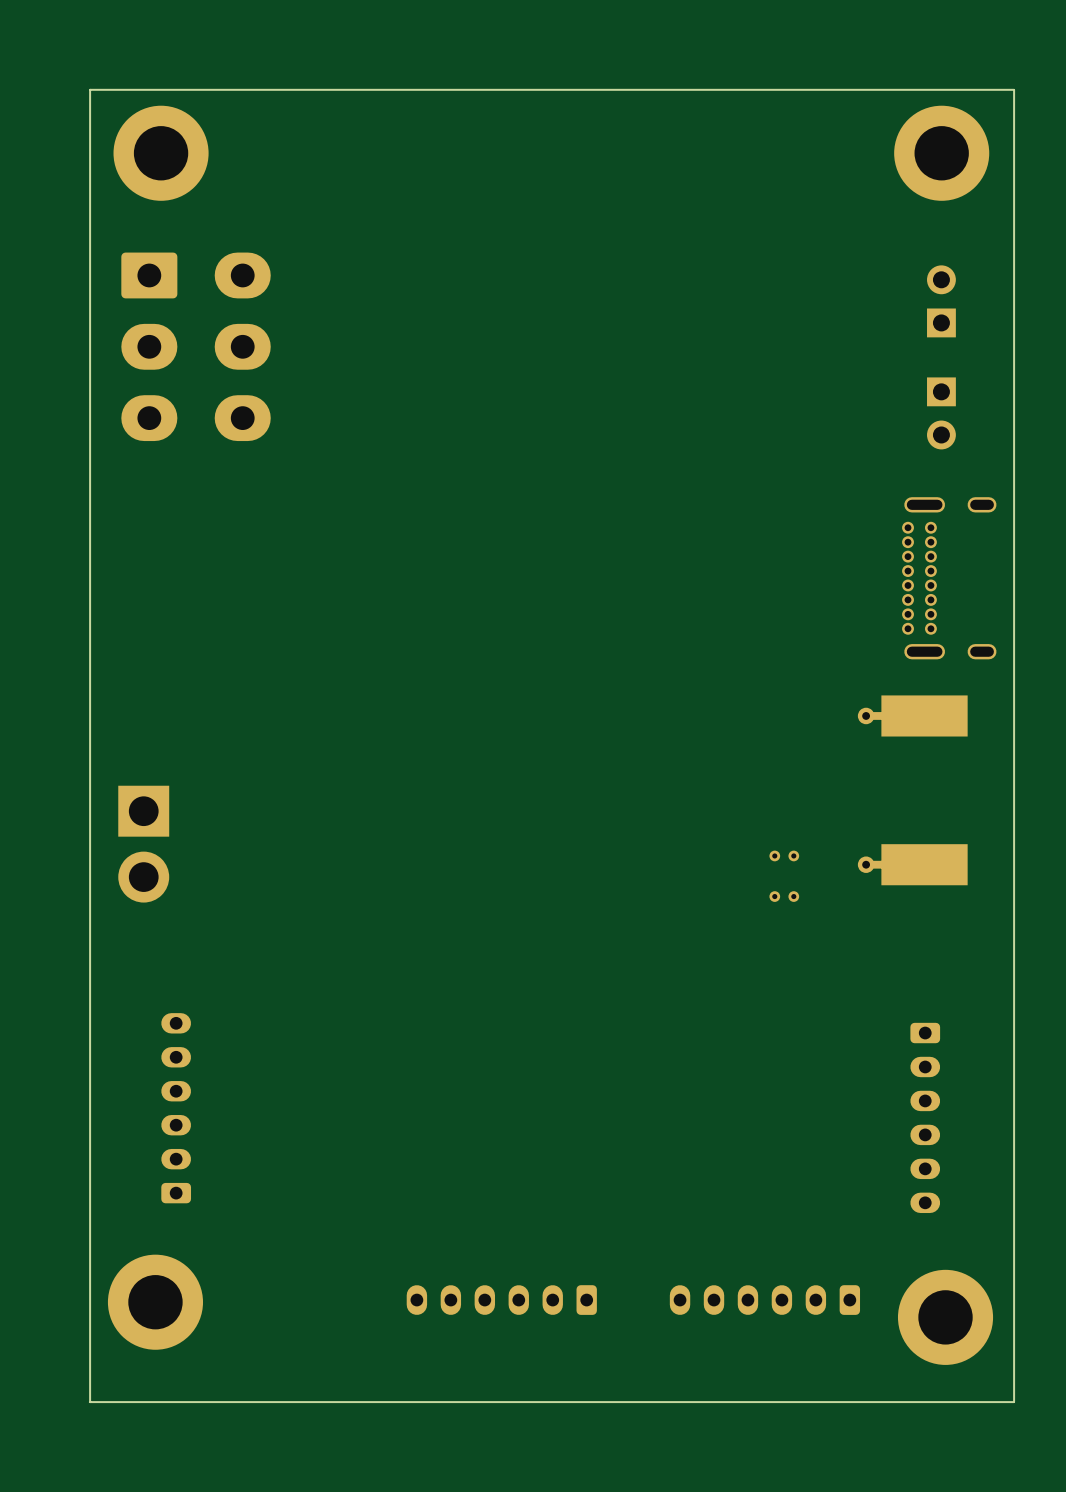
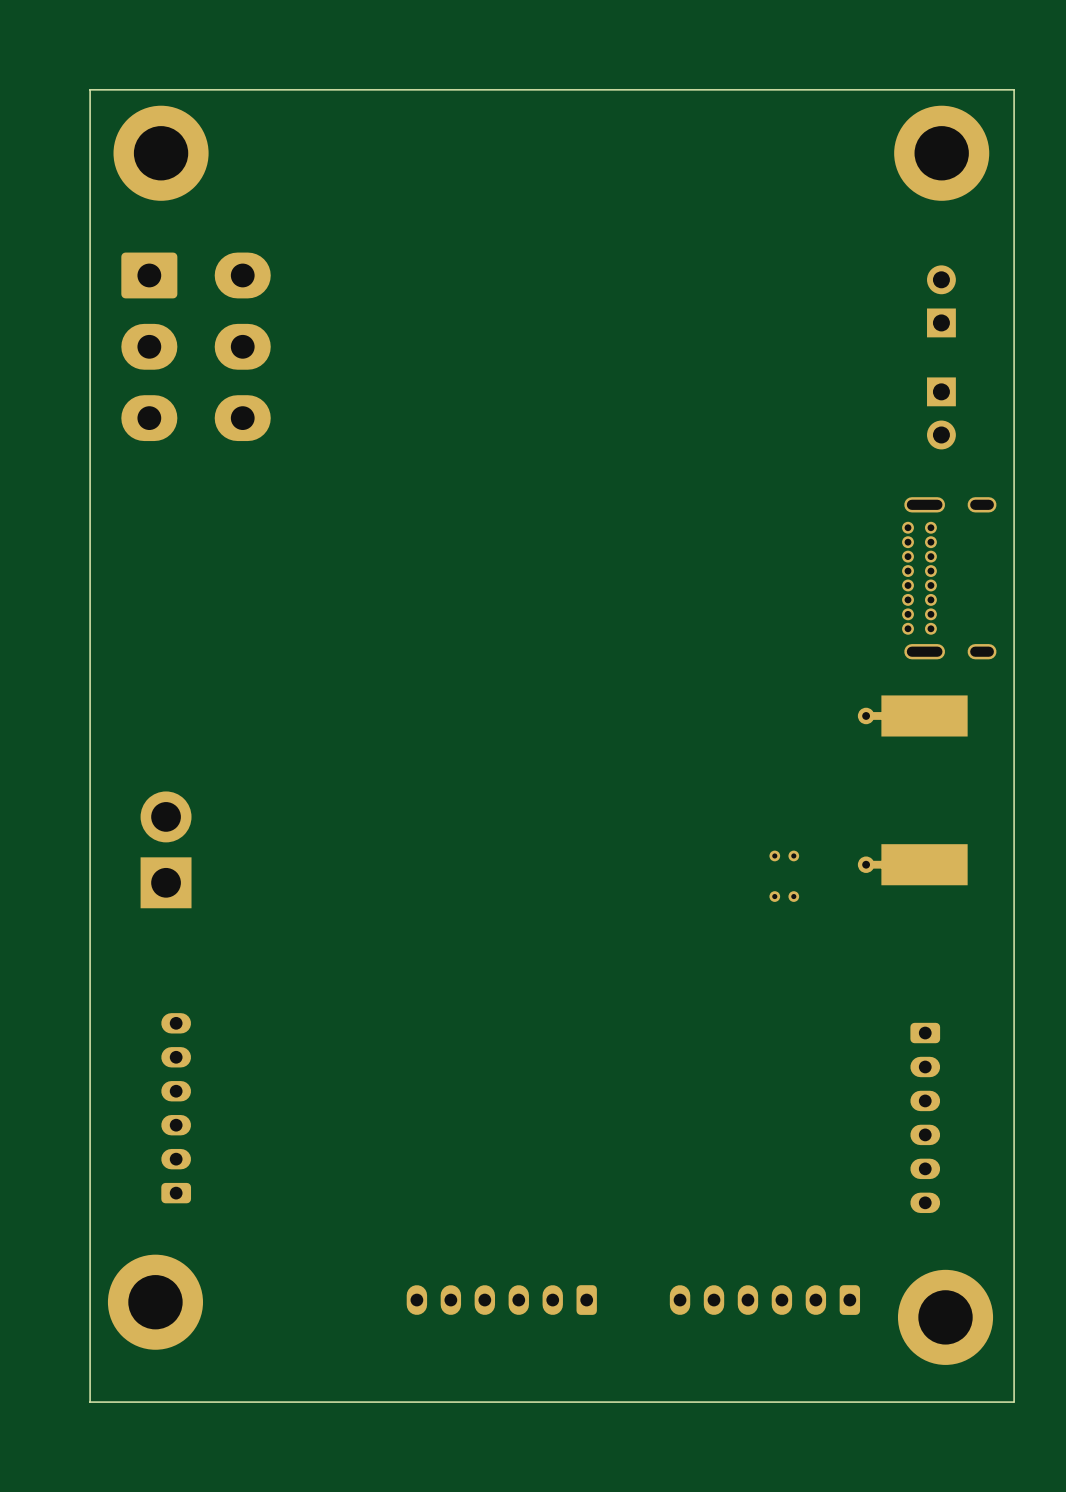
part rotation: 0° (143, 844) -> 180° (166, 849)

